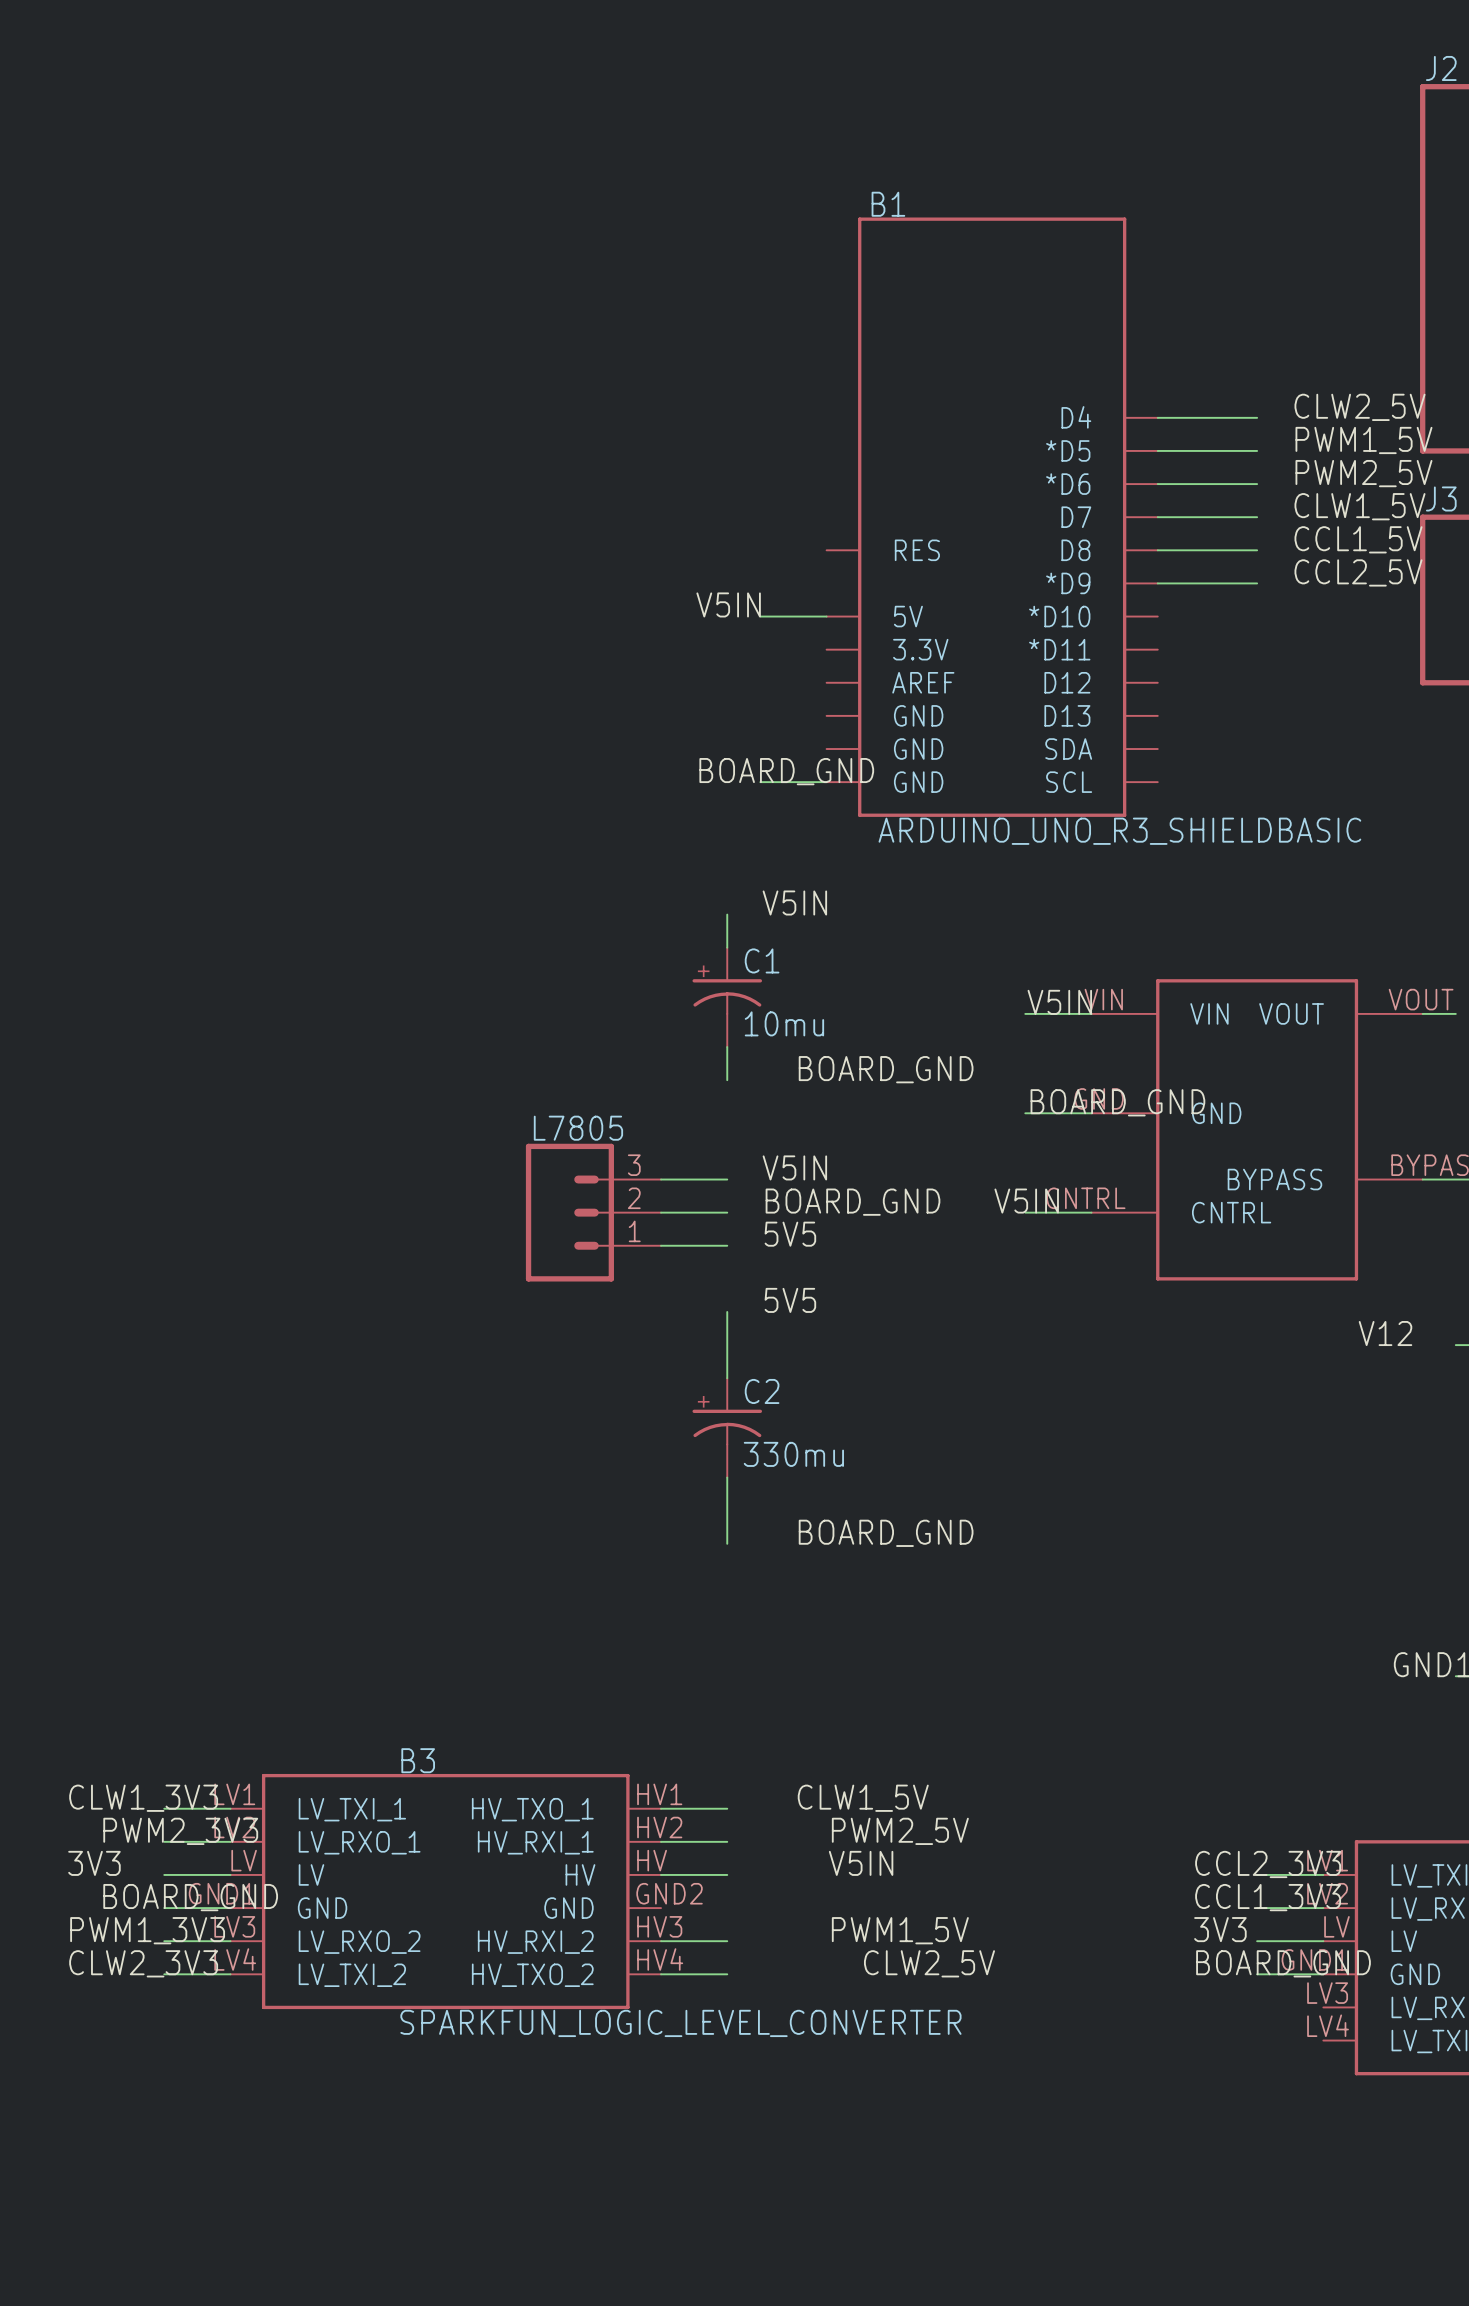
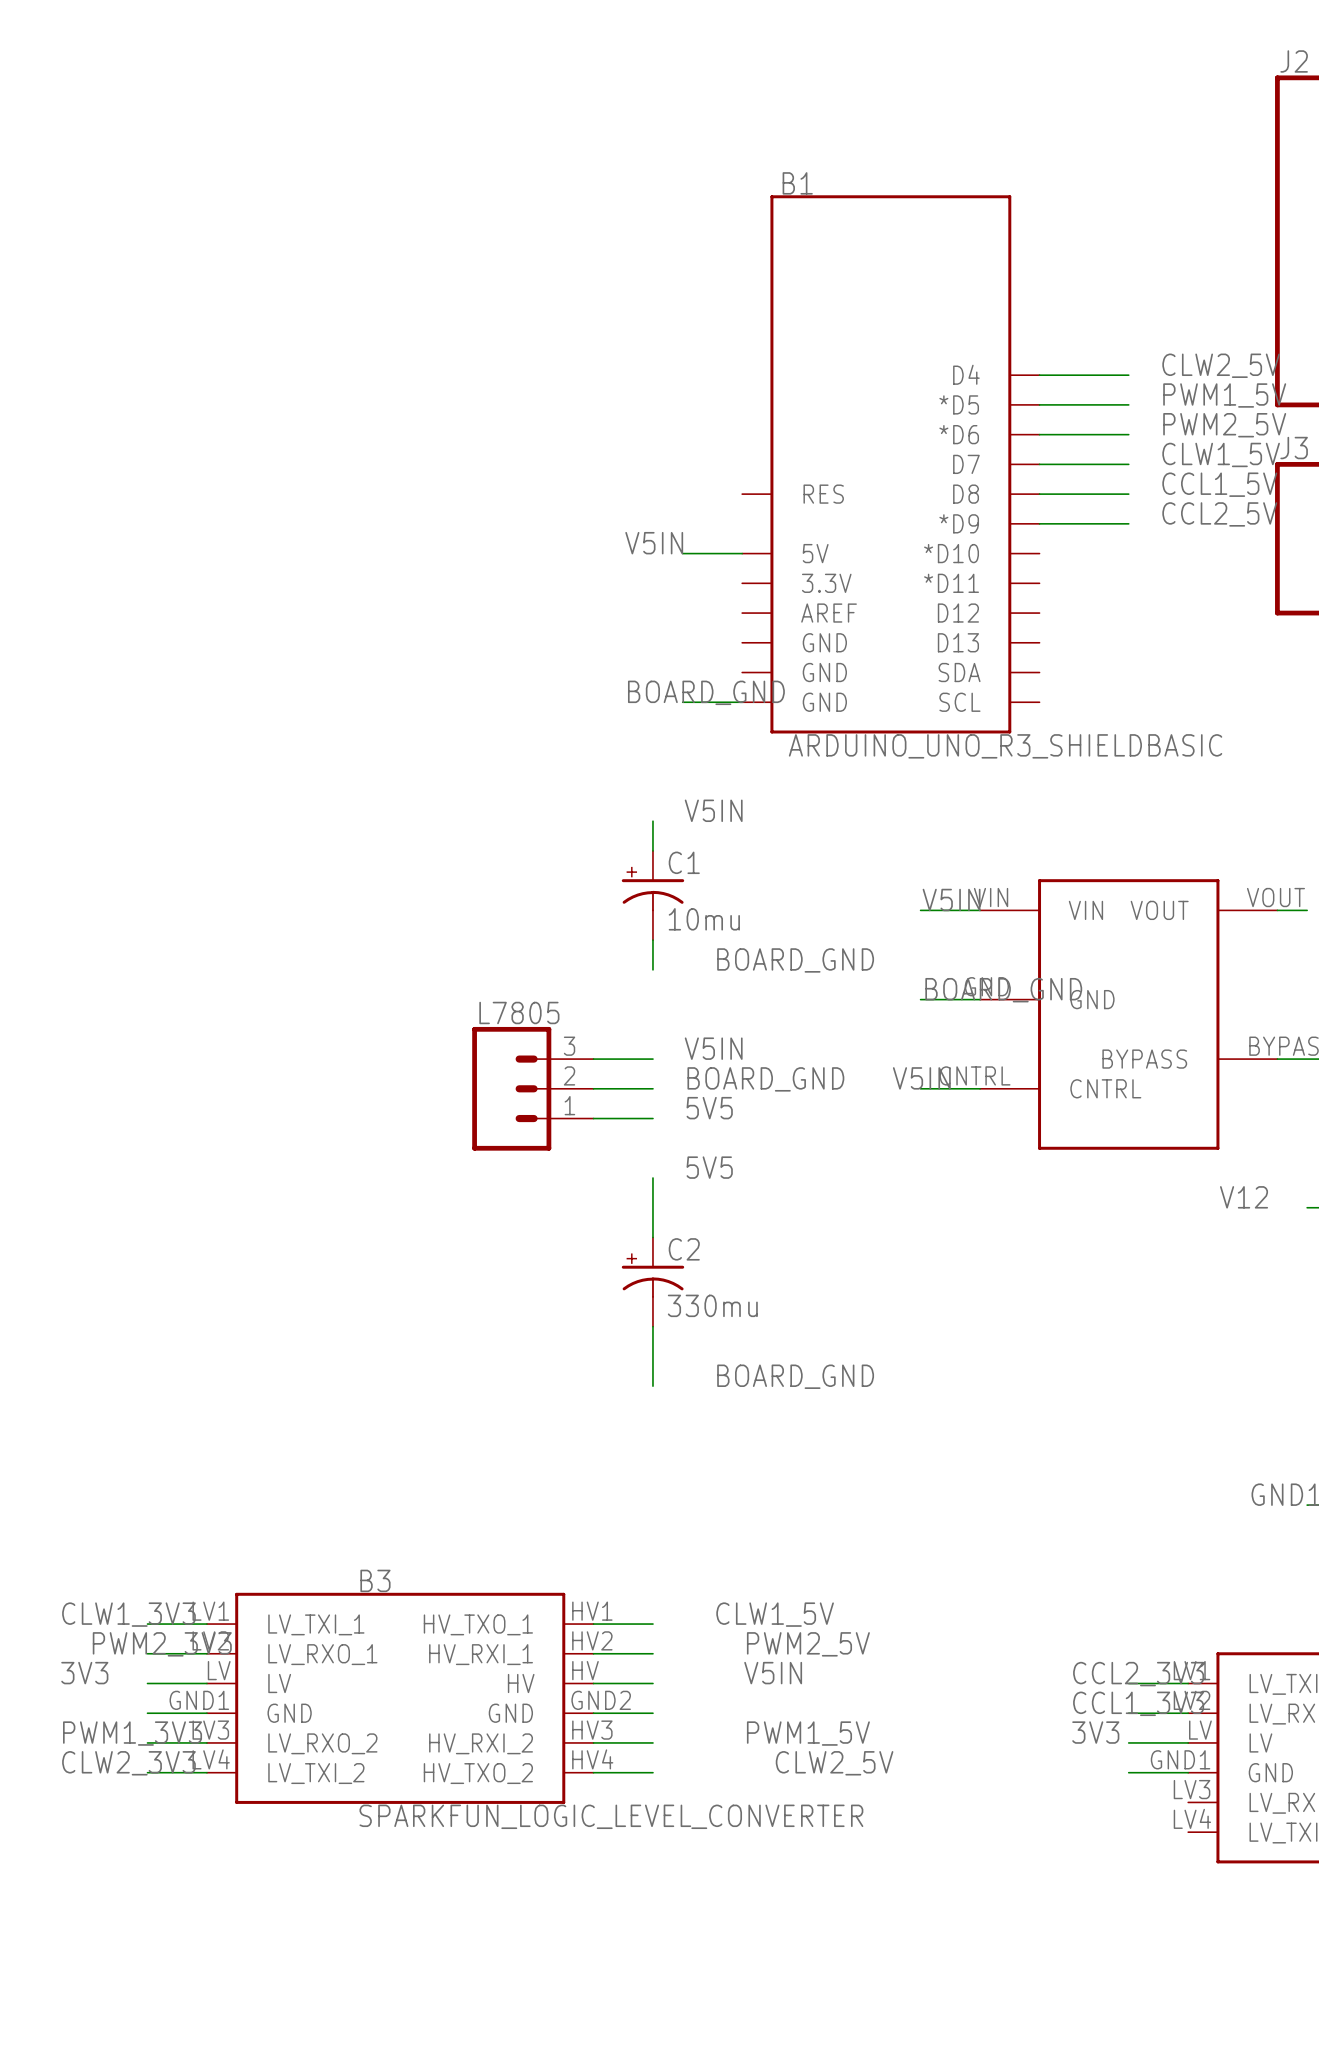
label: BOARD_GND (190, 1897) -> none
wire: none -> (593, 1713) (652, 1713)
label: BOARD_GND (1283, 1963) -> none

